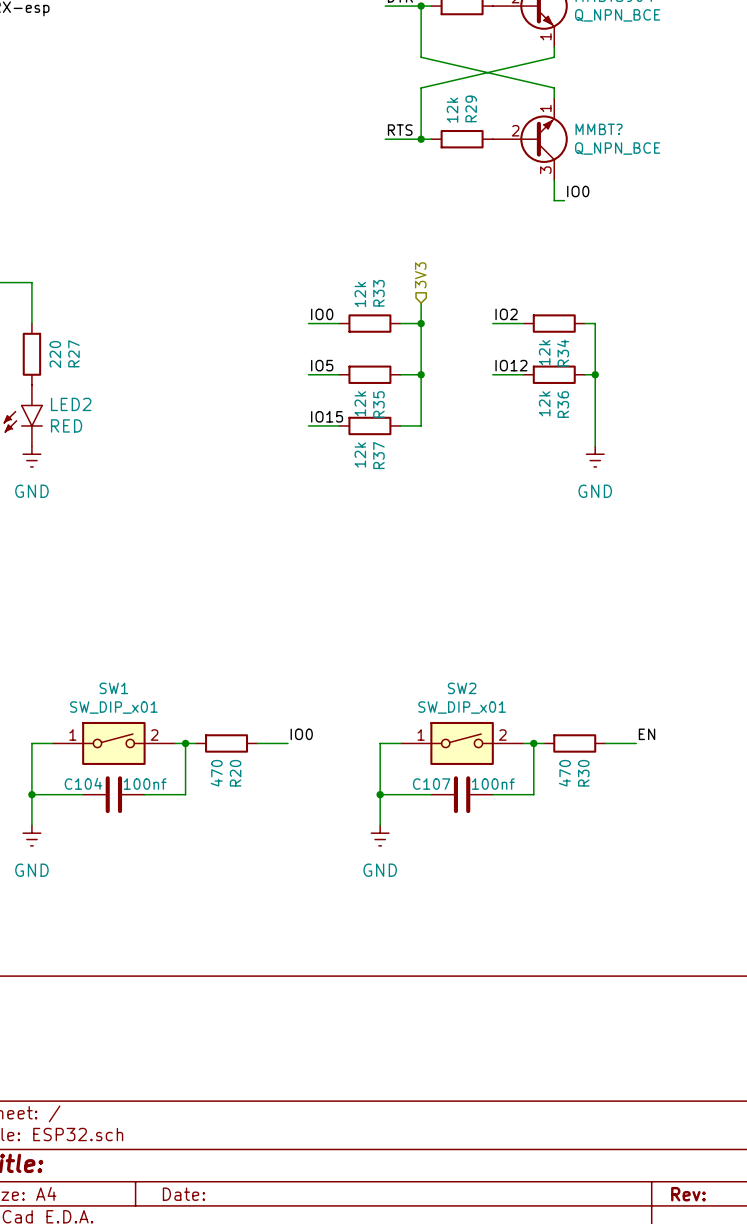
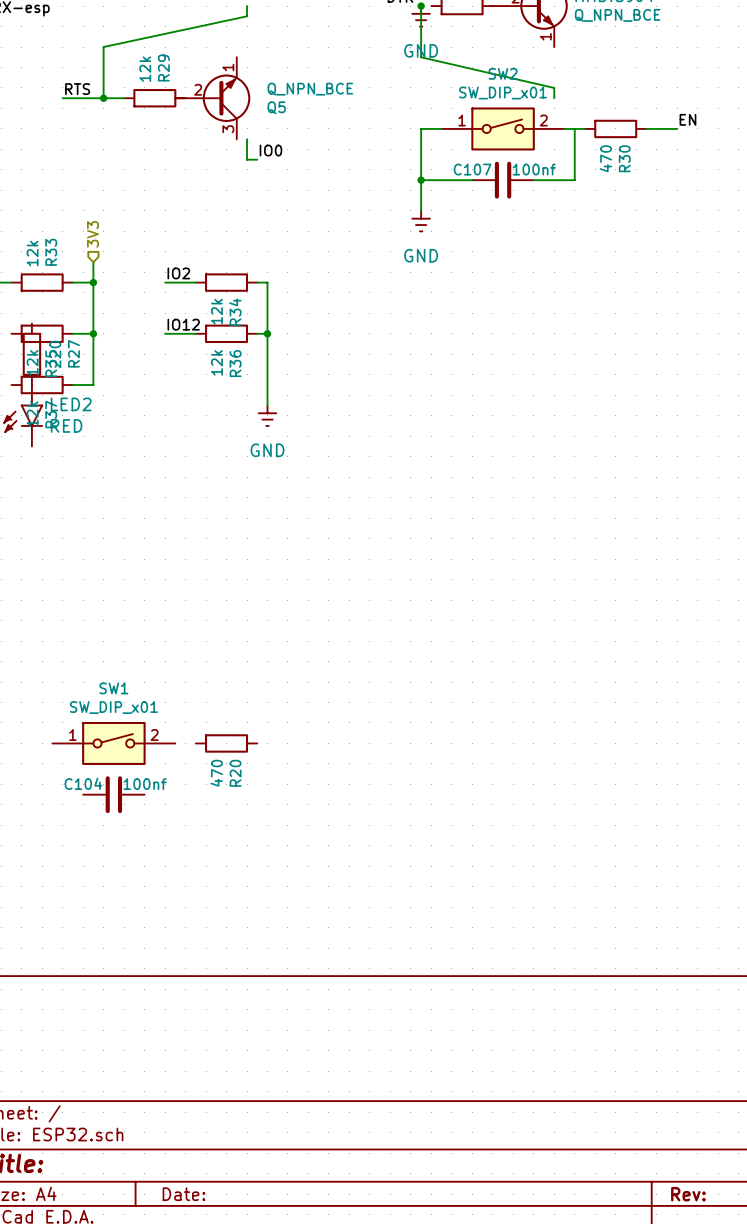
wire: none -> (247, 6) (247, 16) (103, 47) (103, 98)
wire: (385, 6) (431, 6) -> none
power symbol: none -> GND (421, 16)
wire: (554, 47) (554, 57) (421, 87) (421, 128) -> (441, 128) (421, 128)
label: none -> RTS (77, 89)
wire: none -> (62, 98) (124, 98)
junction: none -> (103, 98)
Q5: none -> Q_NPN_BCE (212, 98)
label: none -> EN (687, 119)
wire: none -> (564, 128) (584, 128)
wire: none -> (574, 128) (574, 180) (533, 180)
wire: none -> (646, 128) (677, 128)
label: RTS (400, 130) -> none
wire: none -> (247, 139) (247, 159) (257, 159)
wire: (385, 139) (431, 139) -> none
wire: none -> (421, 139) (421, 210)
junction position: (421, 139) -> (421, 180)
R29 position: (462, 139) -> (154, 98)
MMBT?: Q_NPN_BCE (530, 139) -> none
label: none -> IO0 (270, 150)
wire: none -> (421, 180) (472, 180)
wire: (554, 180) (554, 200) (564, 200) -> none
label: IO0 (578, 191) -> none
power symbol: none -> GND (421, 221)
hierarchical label: none -> 3V3 (93, 234)
wire: none -> (93, 262) (93, 385) (72, 385)
label: none -> IO2 (178, 273)
hierarchical label: 3V3 (420, 275) -> none
wire: (11, 282) (31, 282) (31, 323) -> none
wire: none -> (72, 282) (93, 282)
junction: none -> (93, 282)
wire: none -> (257, 282) (267, 282) (267, 405)
wire: (421, 303) (421, 425) (400, 425) -> none
label: IO0 (322, 314) -> none
label: IO2 (506, 314) -> none
wire: (308, 323) (339, 323) -> (165, 282) (195, 282)
R33 position: (369, 323) -> (42, 282)
wire: (400, 323) (421, 323) -> none
junction: (421, 323) -> none
wire: (492, 323) (523, 323) -> none
R34 position: (554, 323) -> (226, 282)
wire: (584, 323) (595, 323) (595, 446) -> none
label: none -> IO12 (183, 324)
wire: none -> (72, 333) (93, 333)
junction: none -> (93, 333)
wire: none -> (257, 333) (267, 333)
junction: none -> (267, 333)
label: IO5 (322, 365) -> none
label: IO12 (511, 365) -> none
wire: (308, 374) (339, 374) -> (165, 333) (195, 333)
R35 position: (369, 374) -> (42, 333)
wire: (400, 374) (421, 374) -> none
junction: (421, 374) -> none
wire: (492, 374) (523, 374) -> none
R36 position: (554, 374) -> (226, 333)
wire: (584, 374) (595, 374) -> none
junction: (595, 374) -> none
power symbol: none -> GND (267, 415)
label: IO15 (327, 416) -> none
wire: (308, 425) (339, 425) -> none
R37 position: (369, 425) -> (42, 385)
power symbol: GND (31, 456) -> none
power symbol: GND (595, 456) -> none
label: IO0 (301, 734) -> none
label: EN (647, 734) -> none
wire: (52, 743) (31, 743) (31, 825) -> none
wire: (175, 743) (195, 743) -> none
wire: (185, 743) (185, 794) (144, 794) -> none
junction: (185, 743) -> none
wire: (257, 743) (287, 743) -> none
wire: (400, 743) (380, 743) (380, 825) -> none
SW2 position: (462, 743) -> (503, 128)
wire: (523, 743) (544, 743) -> none
wire: (533, 743) (533, 794) (492, 794) -> none
junction: (533, 743) -> none
R30 position: (574, 743) -> (615, 128)
wire: (605, 743) (636, 743) -> none
wire: (31, 794) (83, 794) -> none
junction: (31, 794) -> none
wire: (380, 794) (431, 794) -> none
junction: (380, 794) -> none
C107 position: (462, 794) -> (503, 180)
power symbol: GND (31, 835) -> none
power symbol: GND (380, 835) -> none

